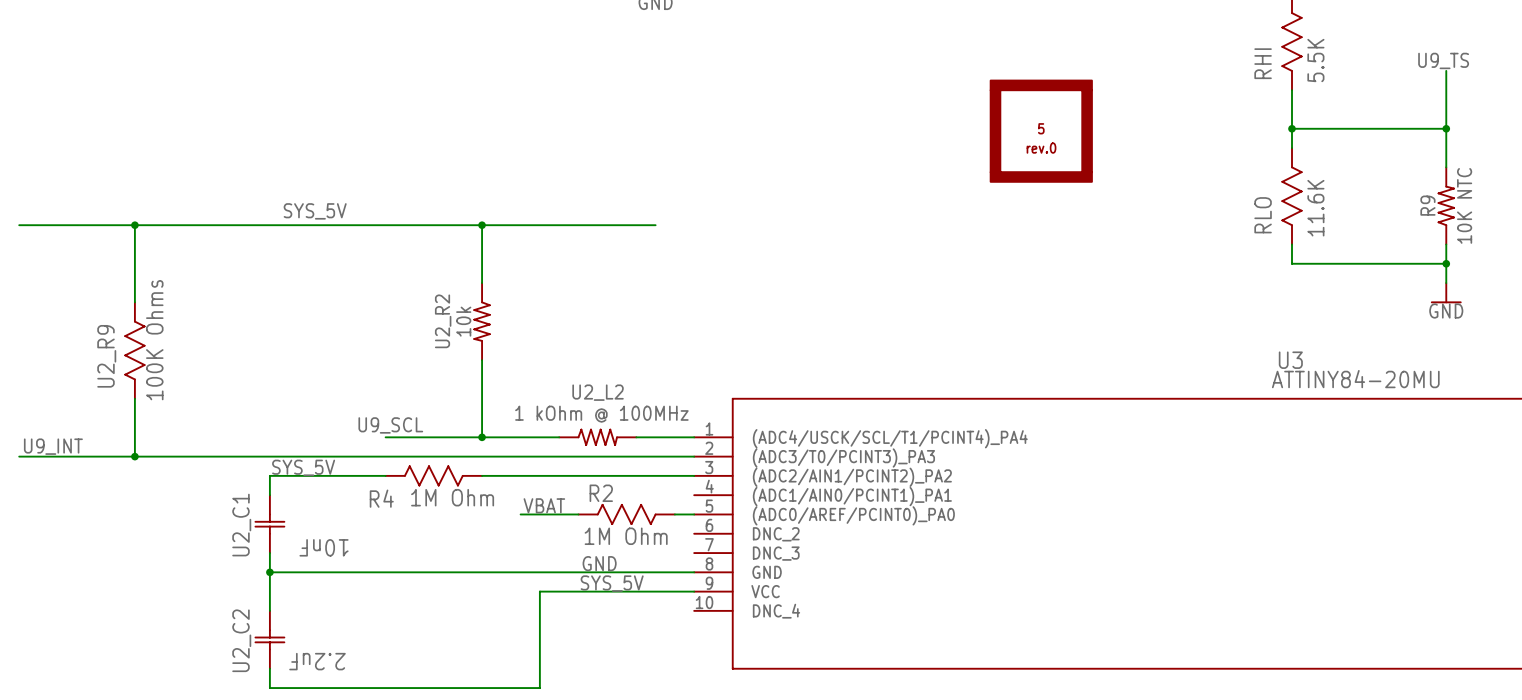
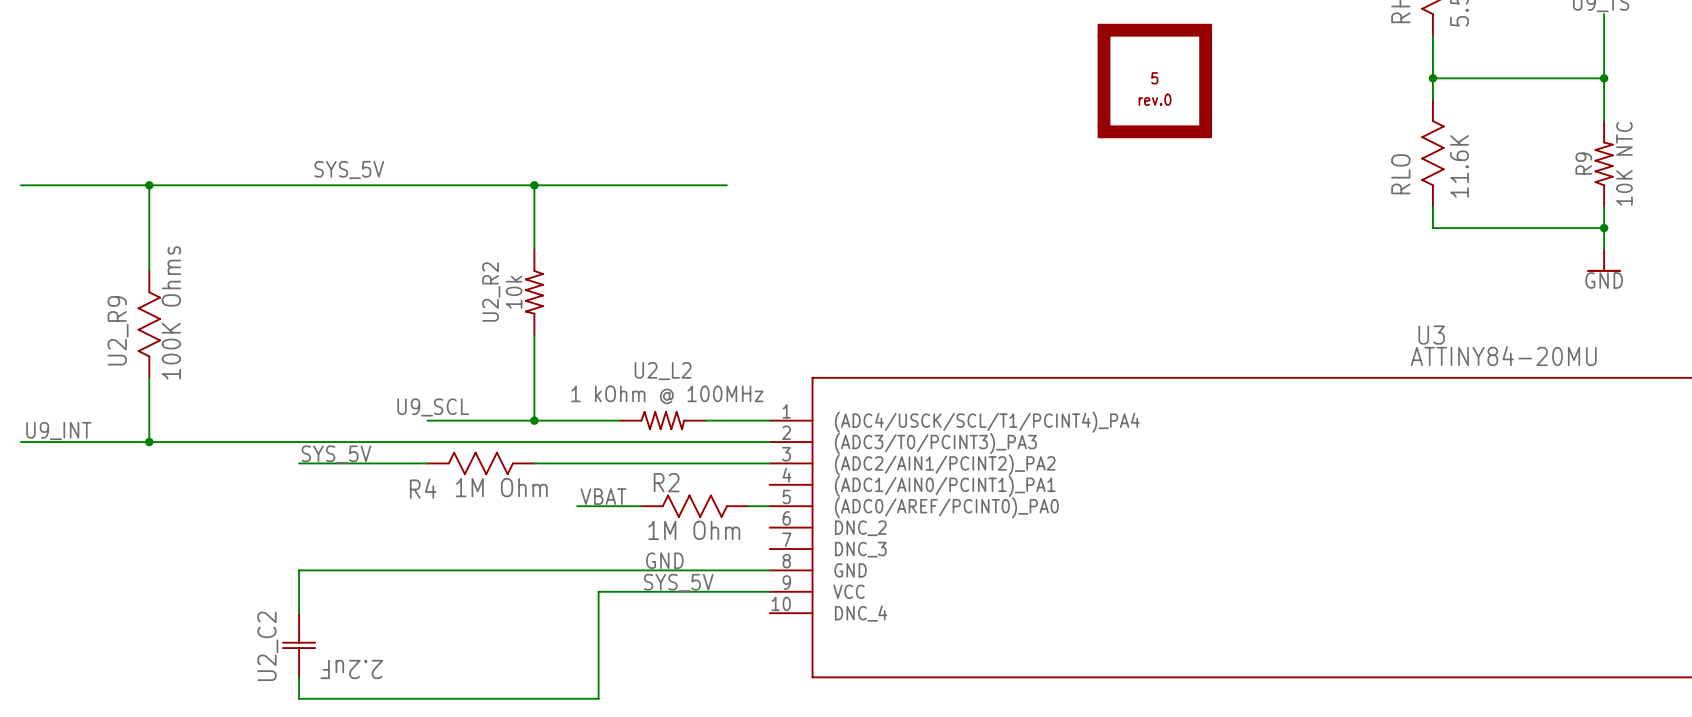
wire: (269, 475) (269, 495) -> none
U2_C1: 10nF (269, 524) -> none
wire: (269, 553) (269, 572) -> none
junction: (269, 572) -> none

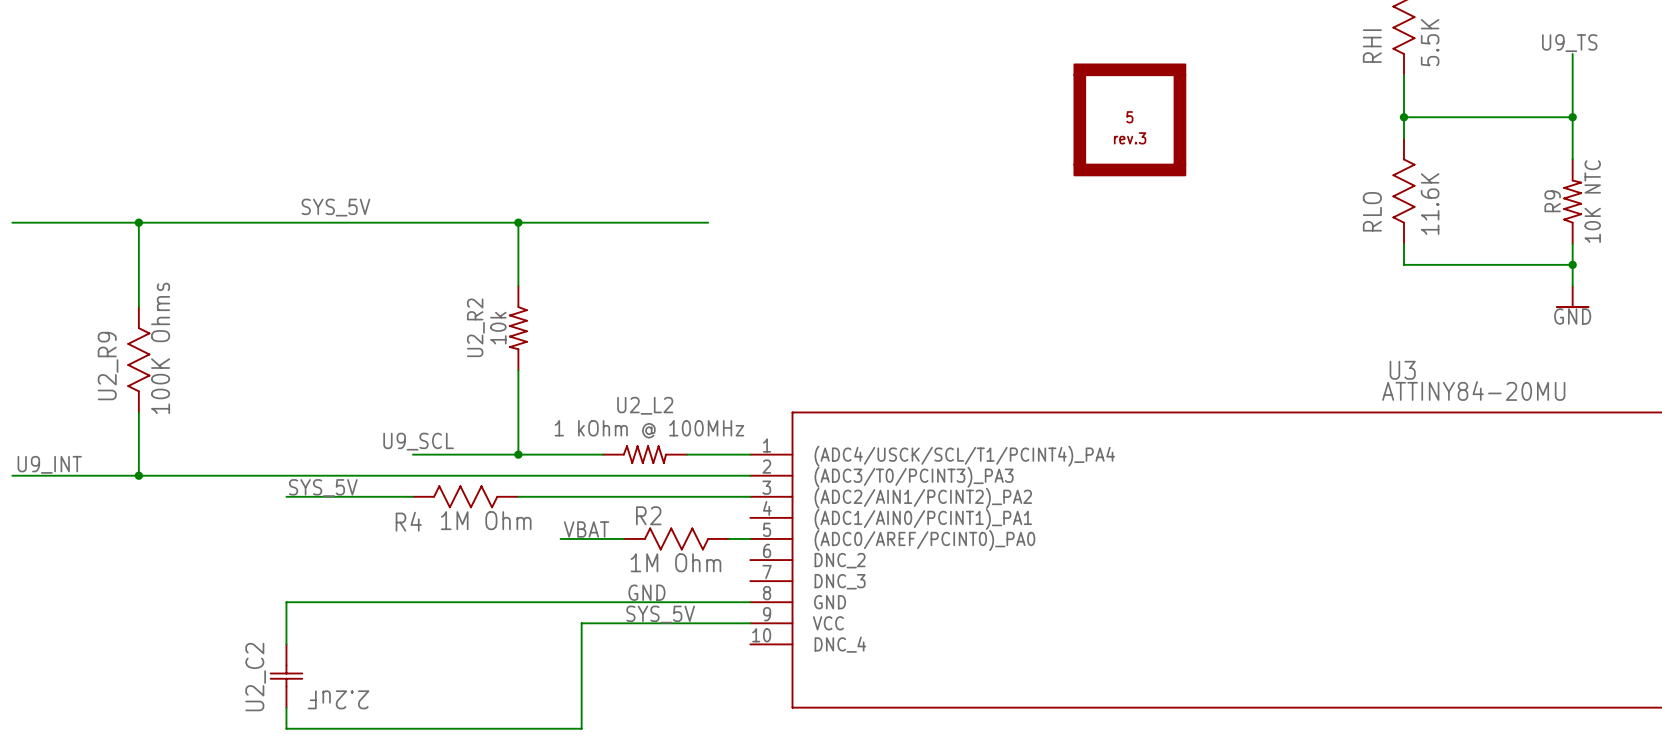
5 value: rev.0 (1155, 99) -> rev.3 (1130, 138)

